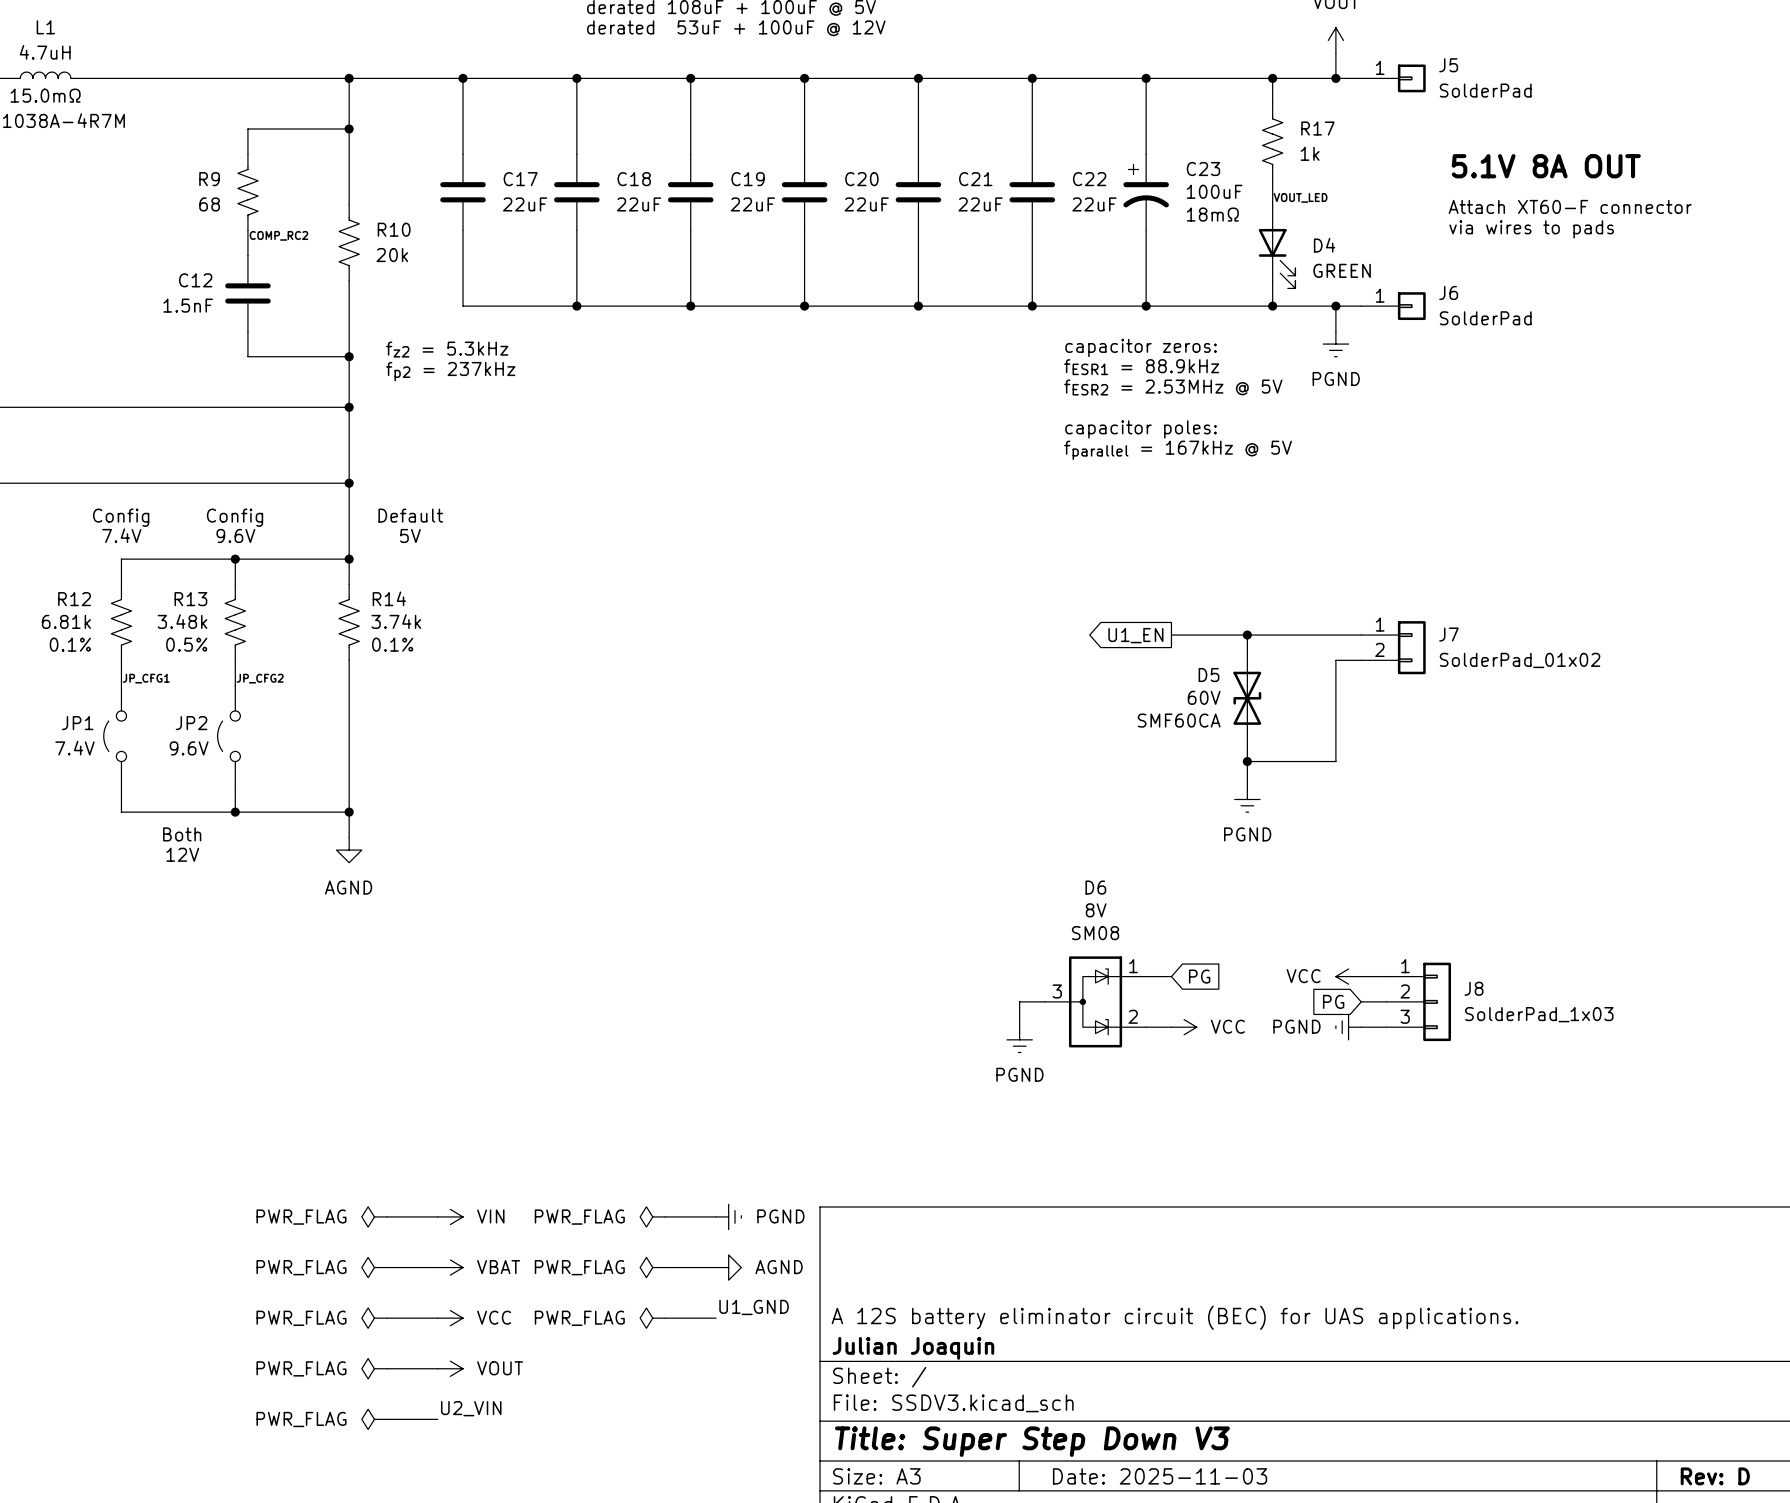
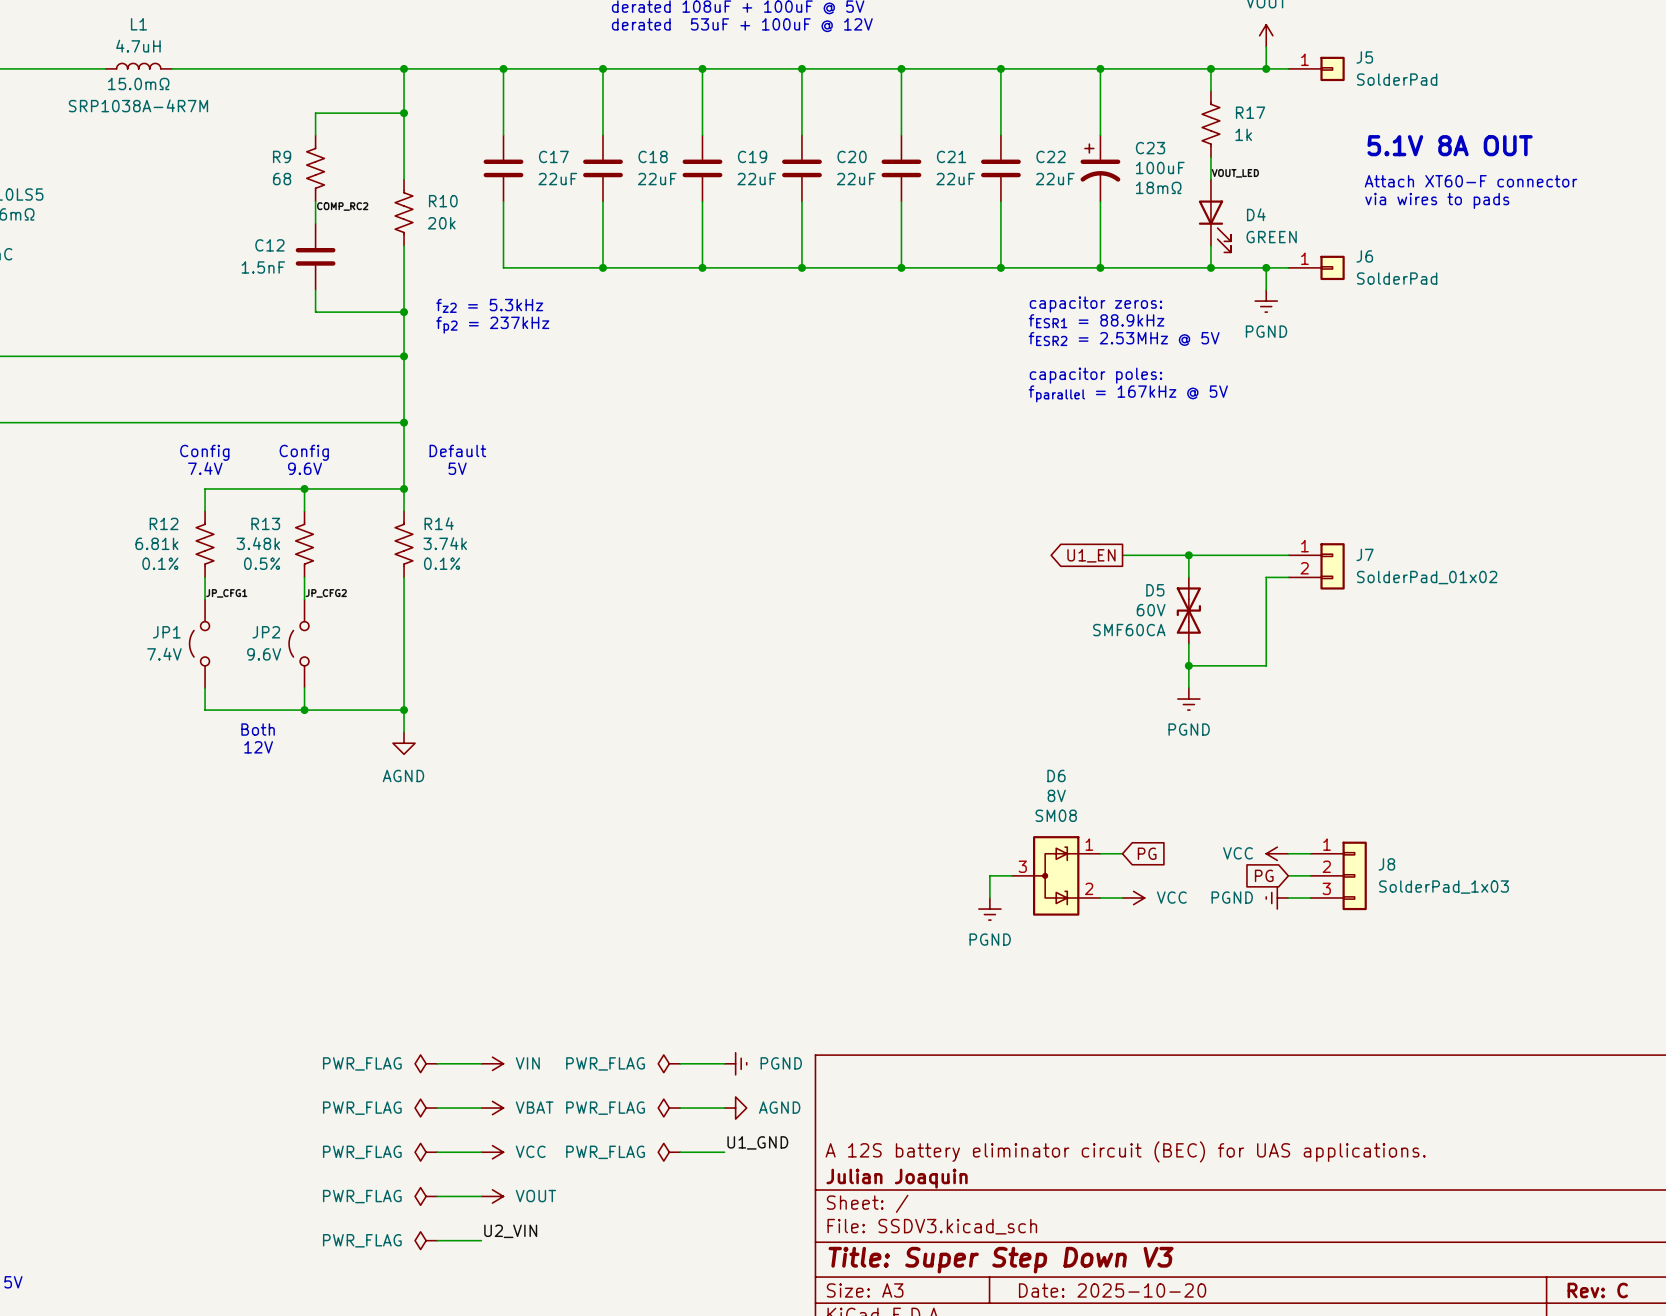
title block: Date: 2025-11-03 (1160, 1476) -> Date: 2025-10-20 (1112, 1290)
title block: Rev: D (1715, 1476) -> Rev: C (1597, 1290)

